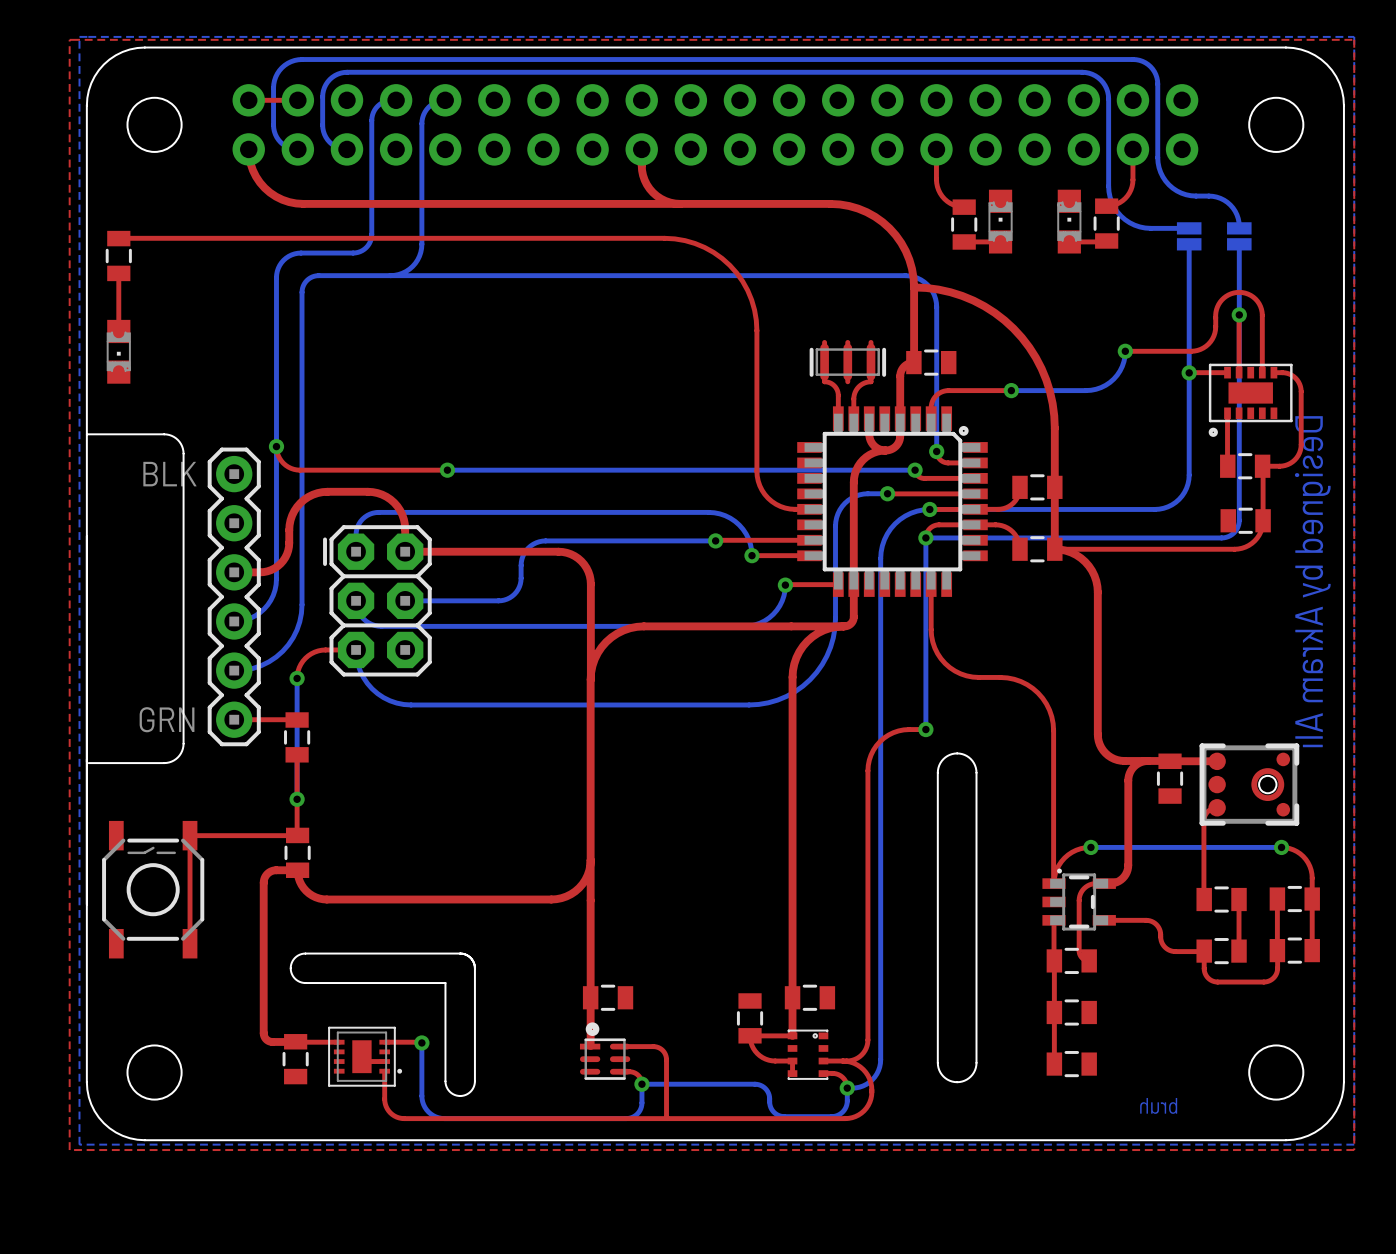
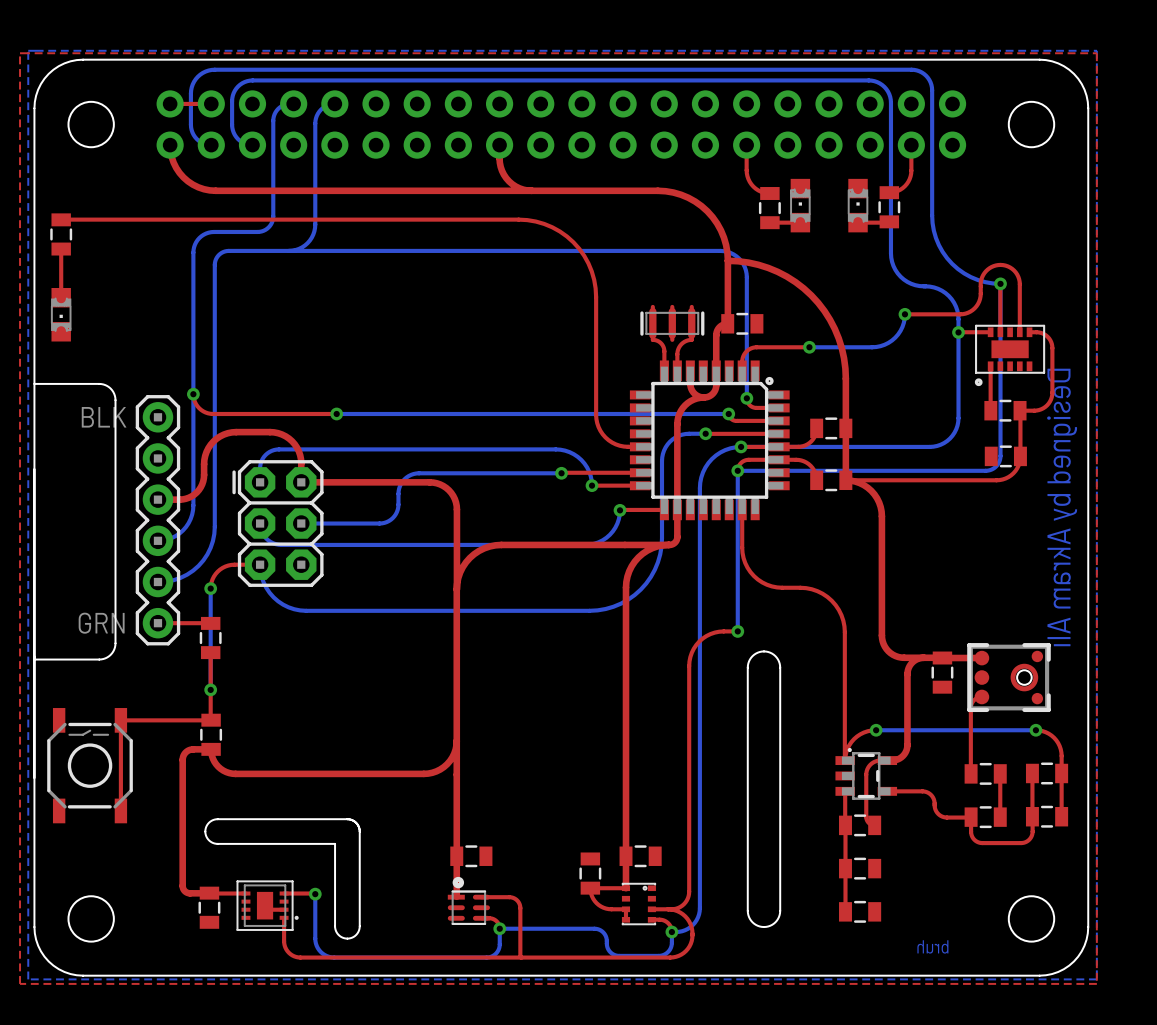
bottom track: (1157, 157) (1160, 172) (1172, 188) (1186, 194) (1212, 196) (1224, 200) (1235, 211) (1239, 228) -> (932, 152) (932, 223) (938, 245) (952, 263) (964, 273) (977, 280) (1000, 283)
bottom track: (1108, 186) (1114, 207) (1129, 222) (1145, 228) (1189, 228) -> none
part: (1189, 236) -> none
part: (1239, 236) -> none
bottom track: (1189, 244) (1189, 357) -> (890, 175) (890, 253) (893, 265) (900, 276) (907, 281) (915, 285) (934, 287) (945, 293) (956, 306) (958, 319)
bottom track: (1239, 244) (1239, 314) -> none

